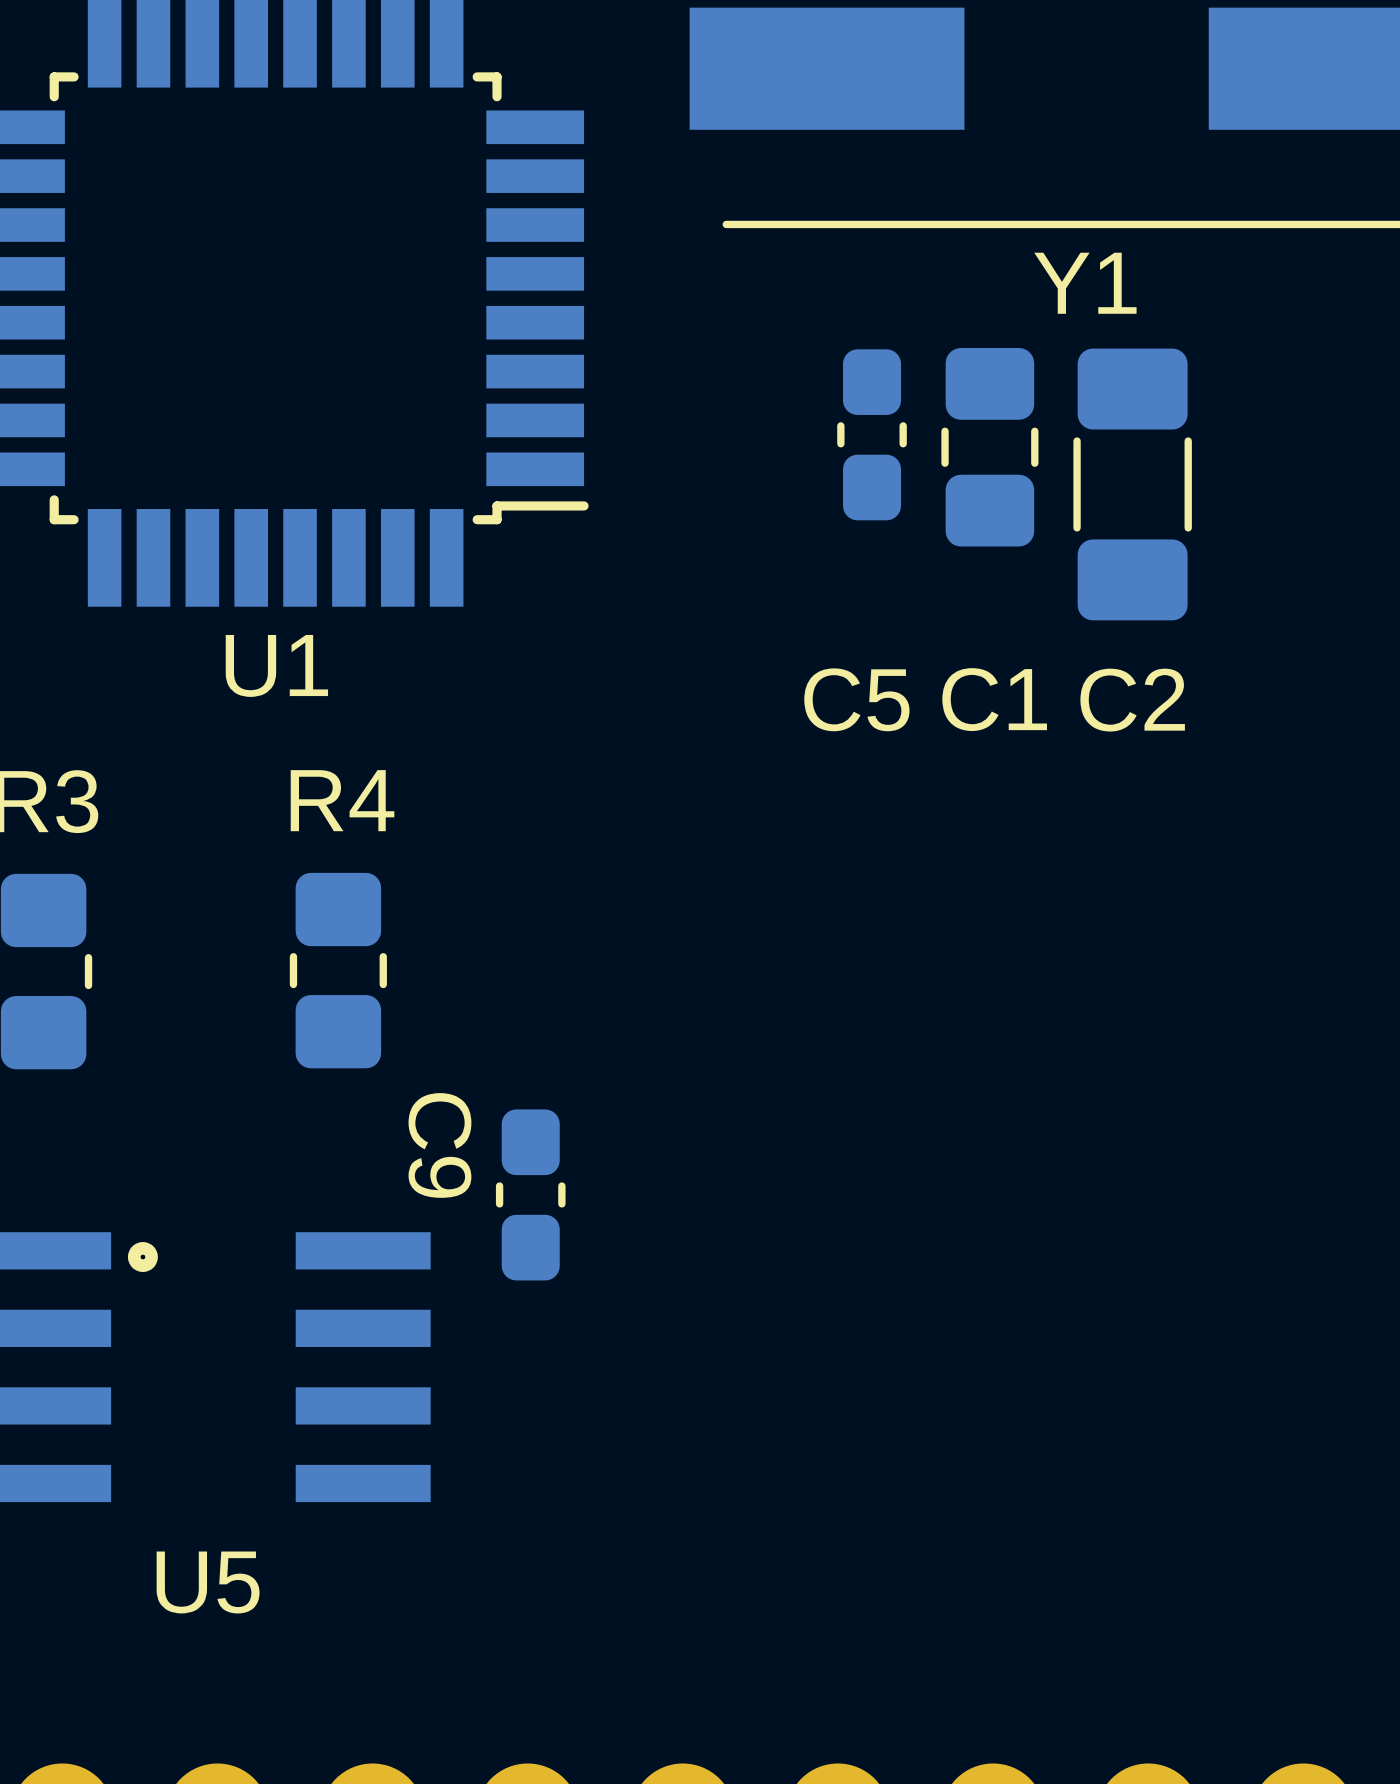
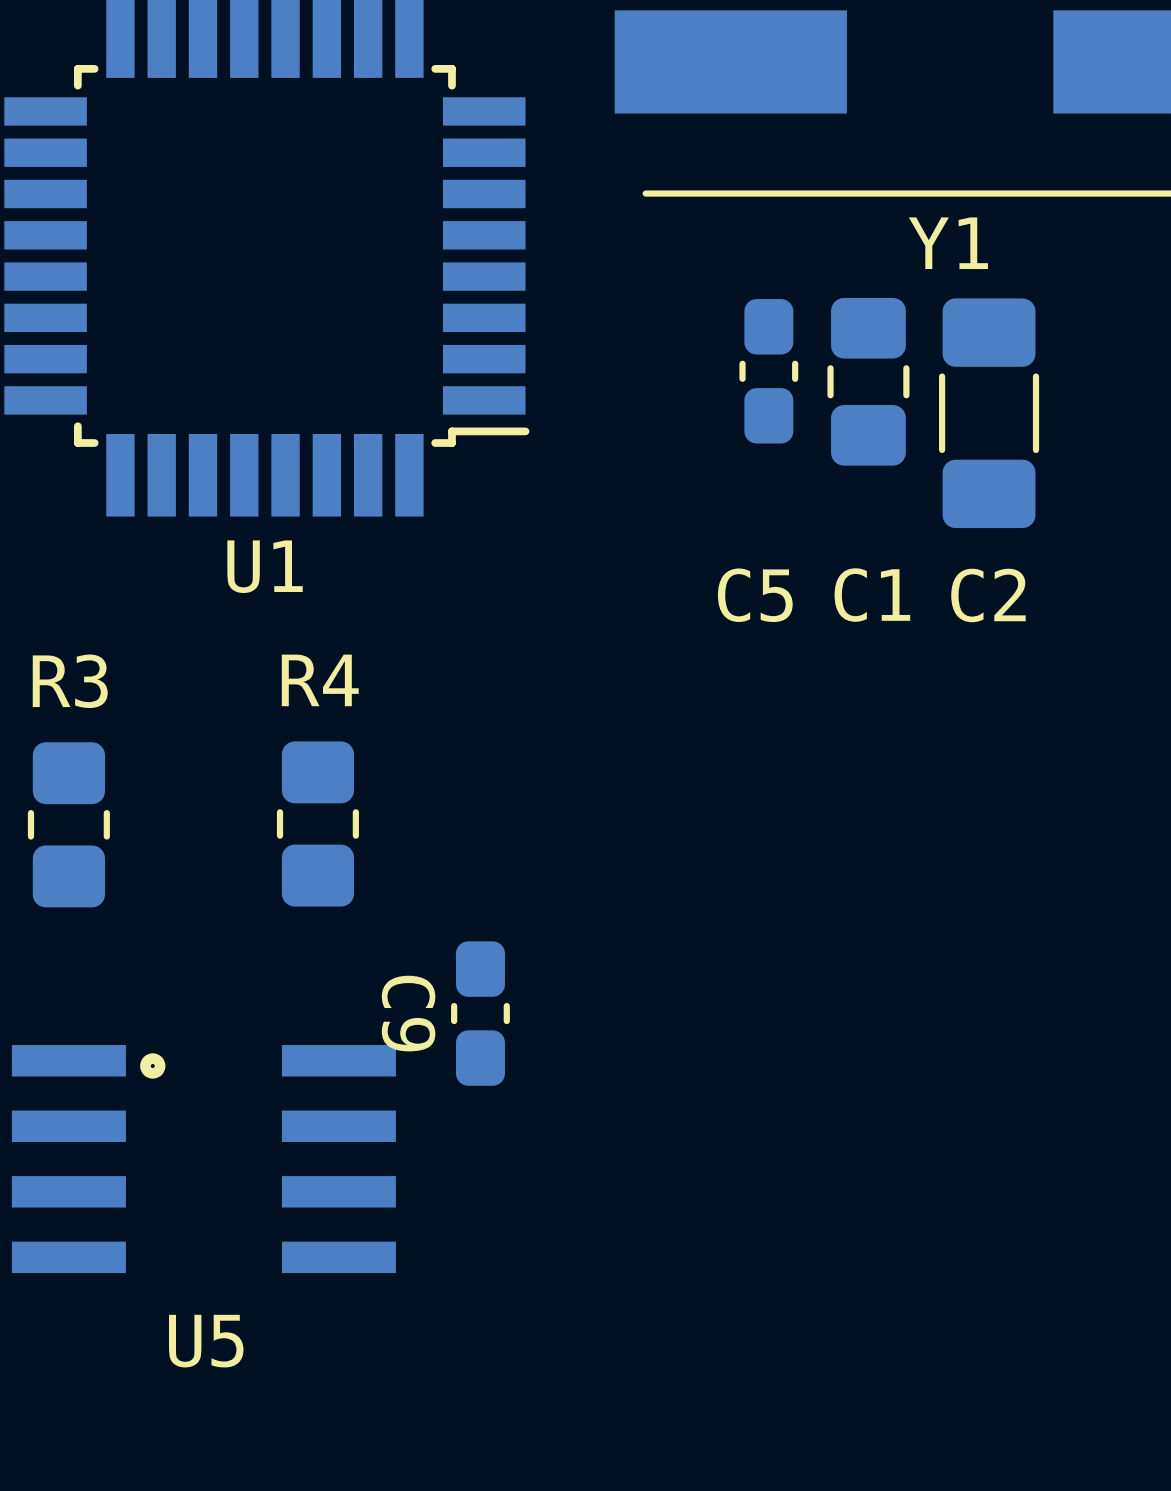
C9 name position: C9 (439, 1145) -> C9 (408, 1013)

